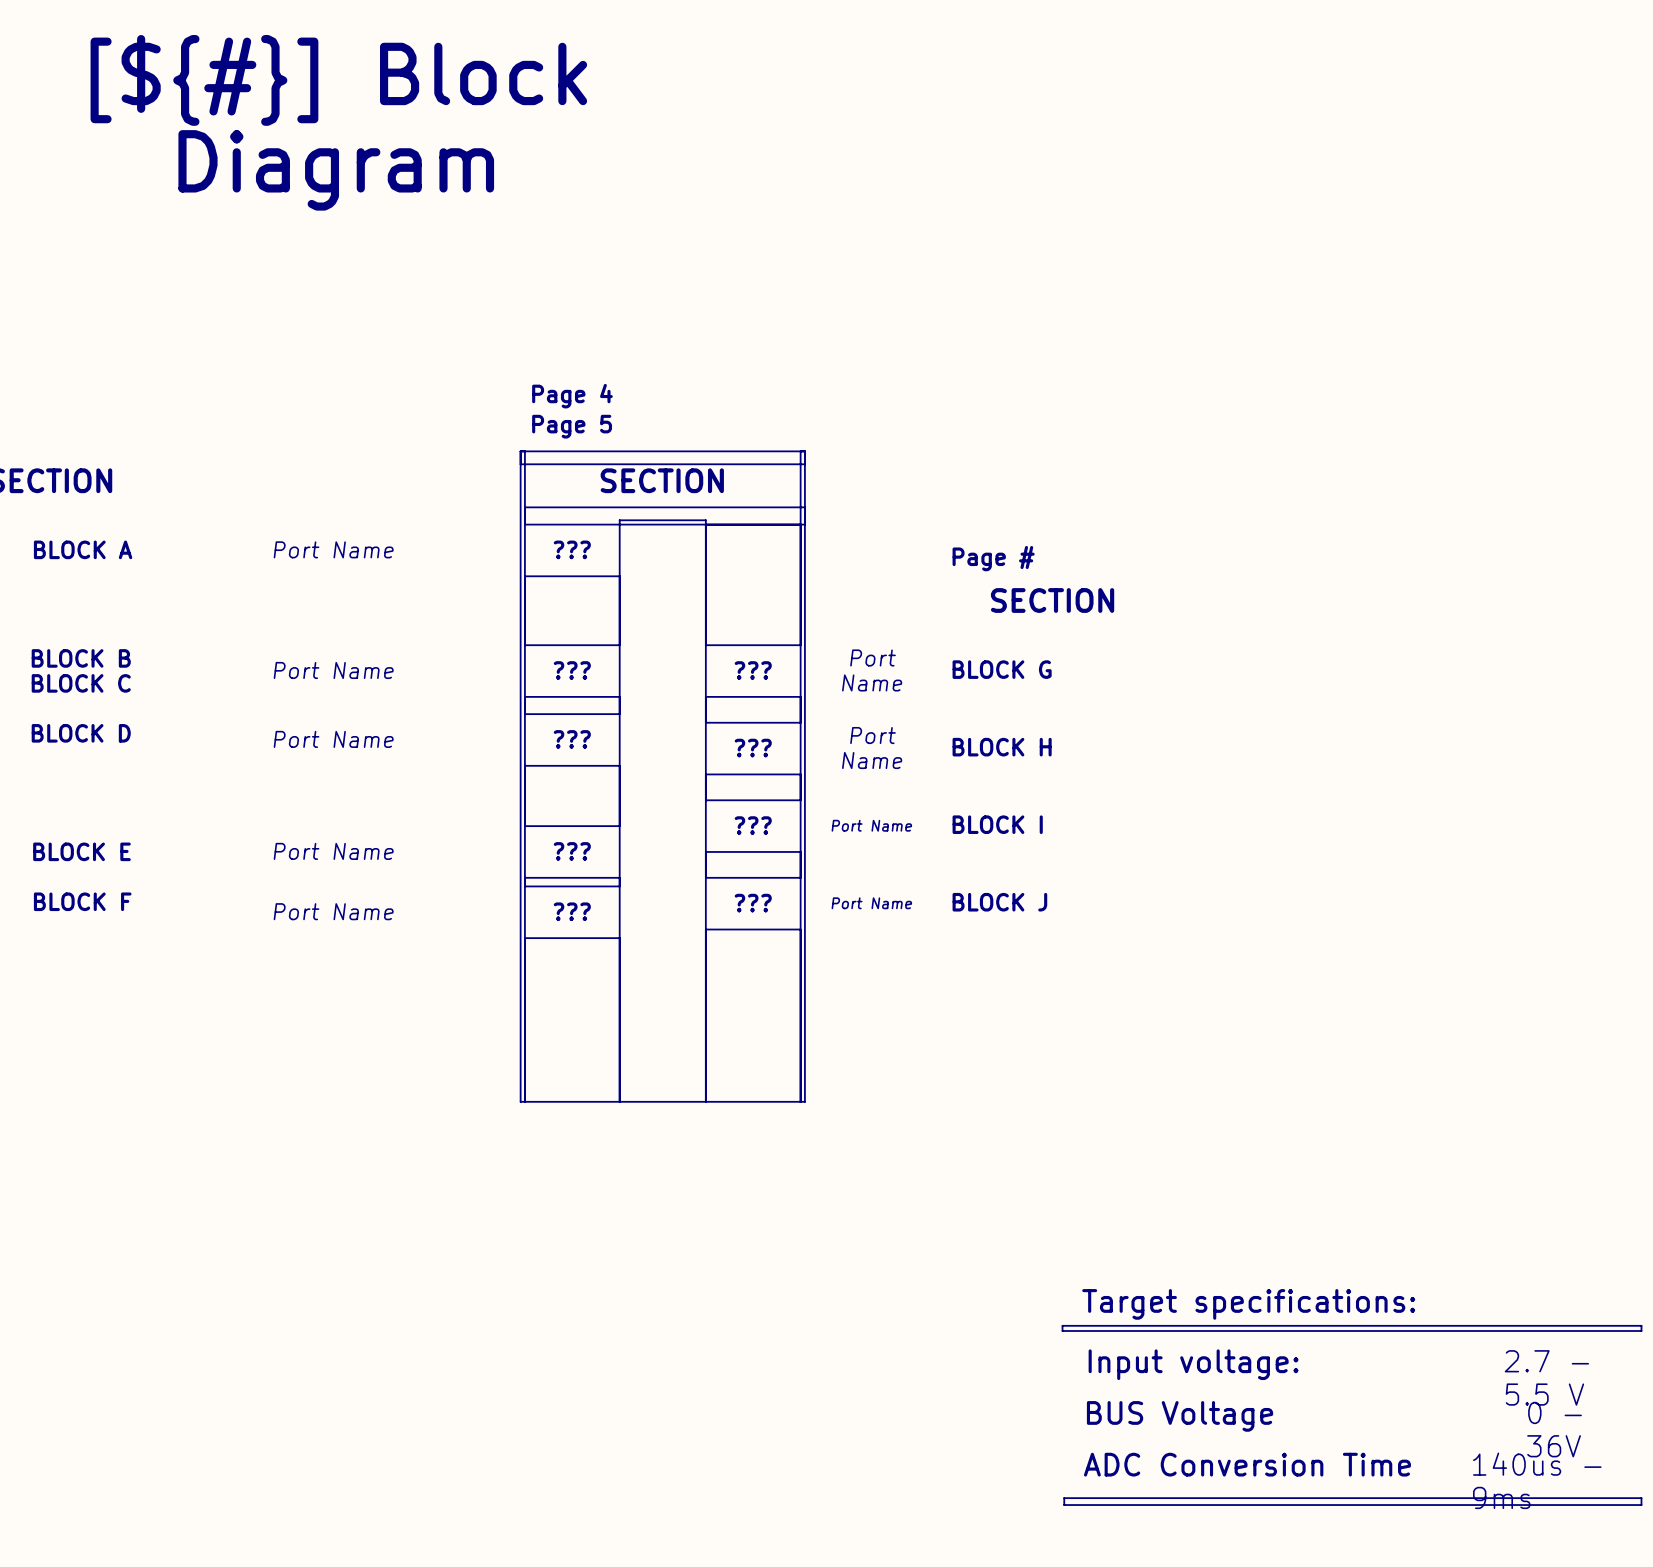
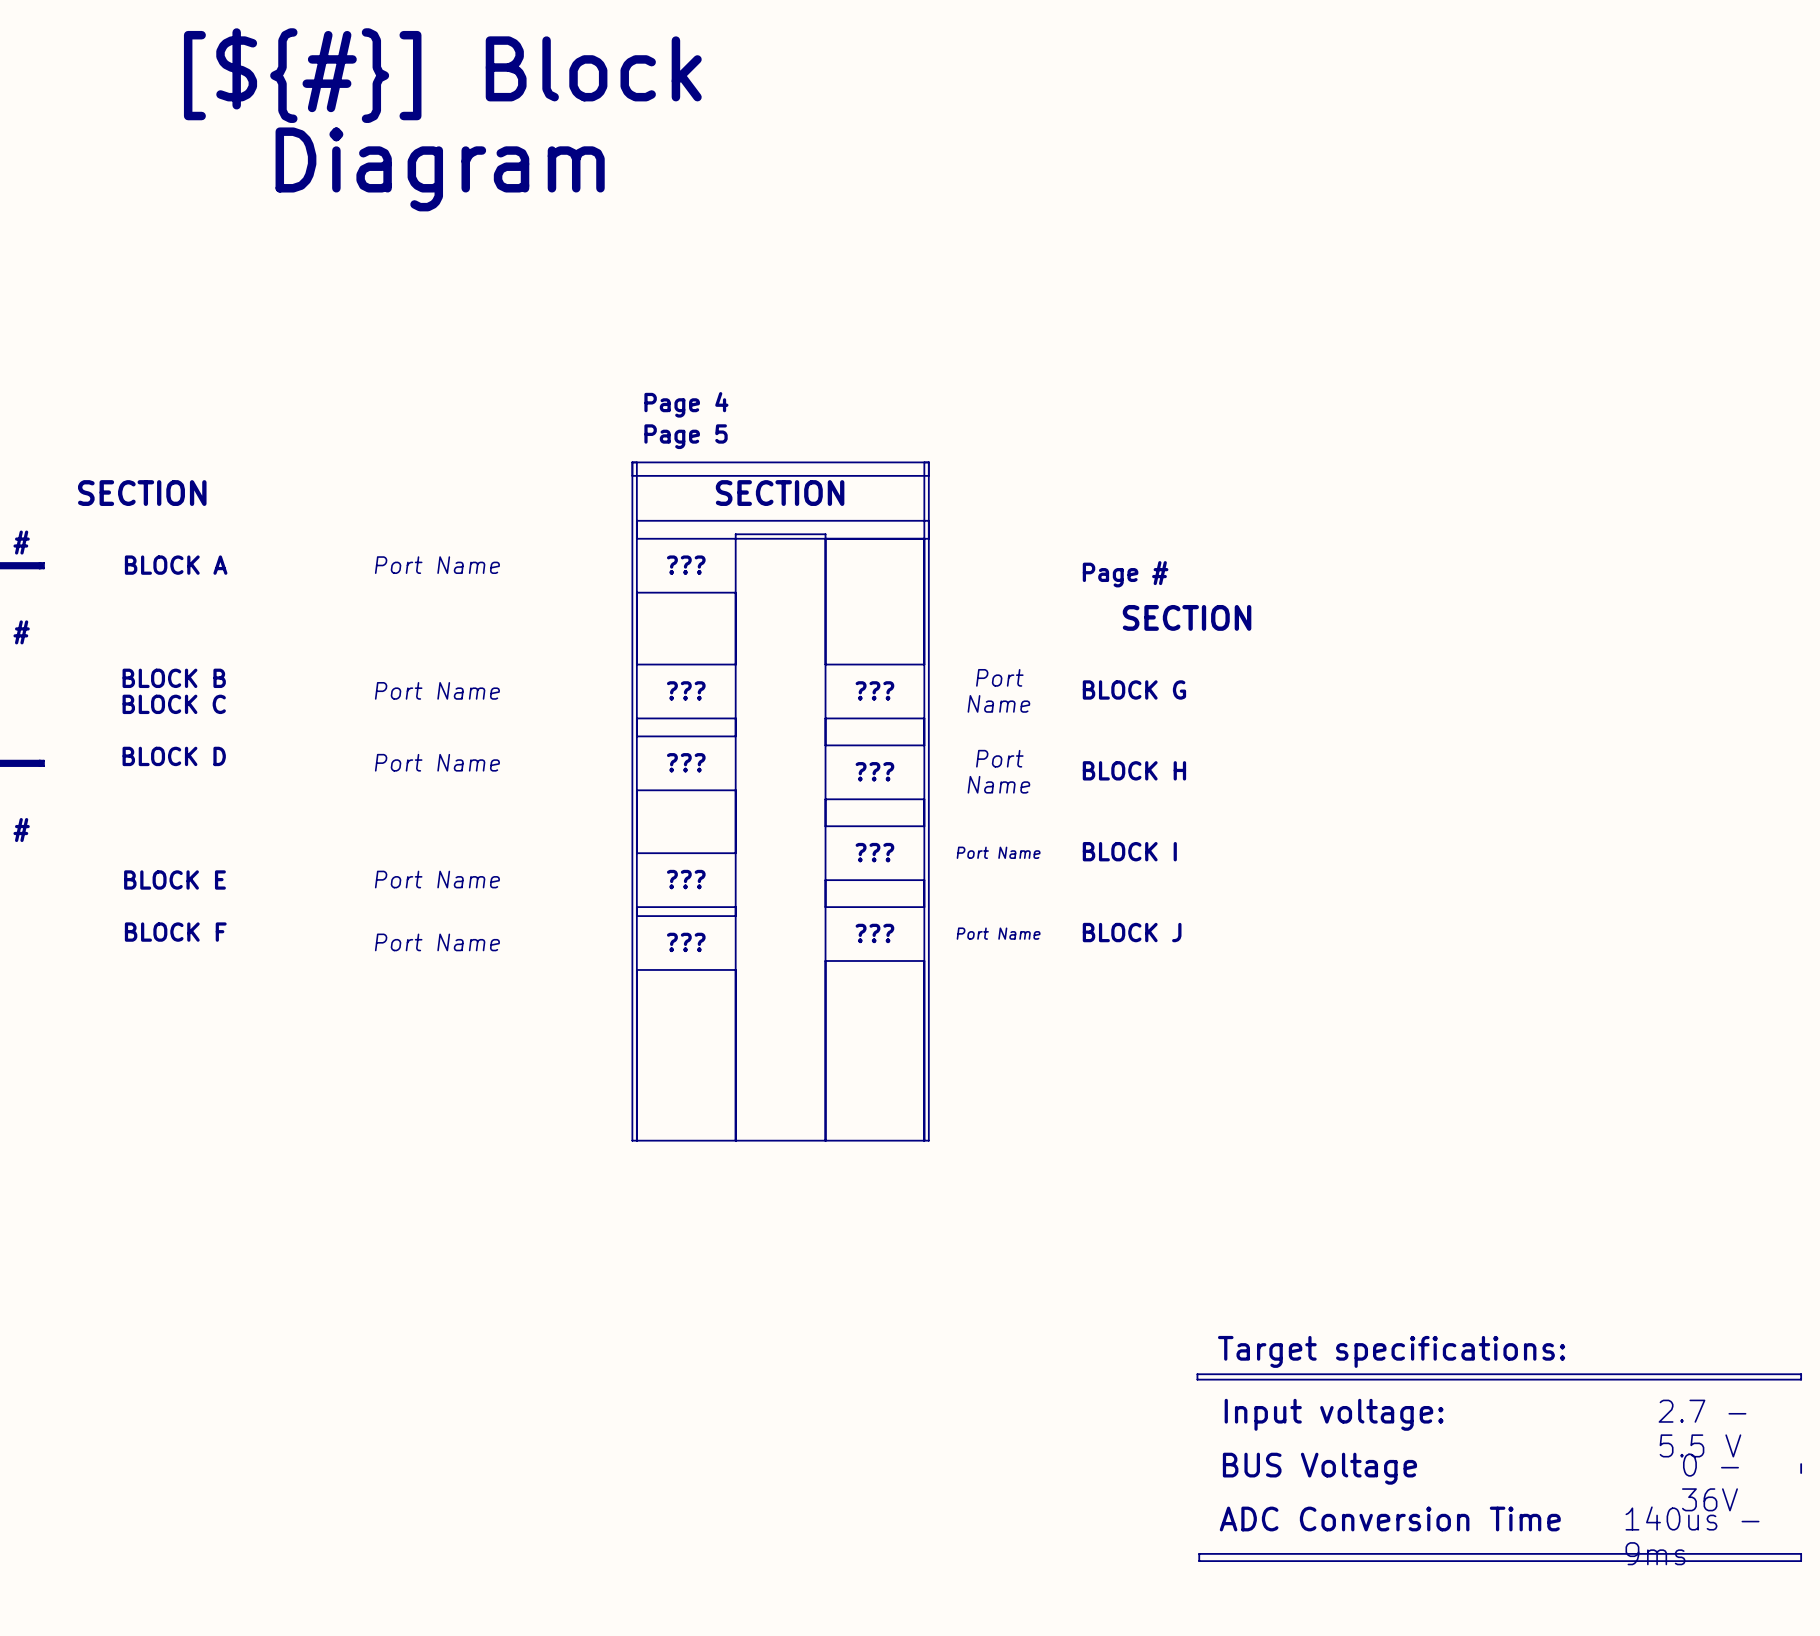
wire: none -> (1801, 1464) (1801, 1473)

